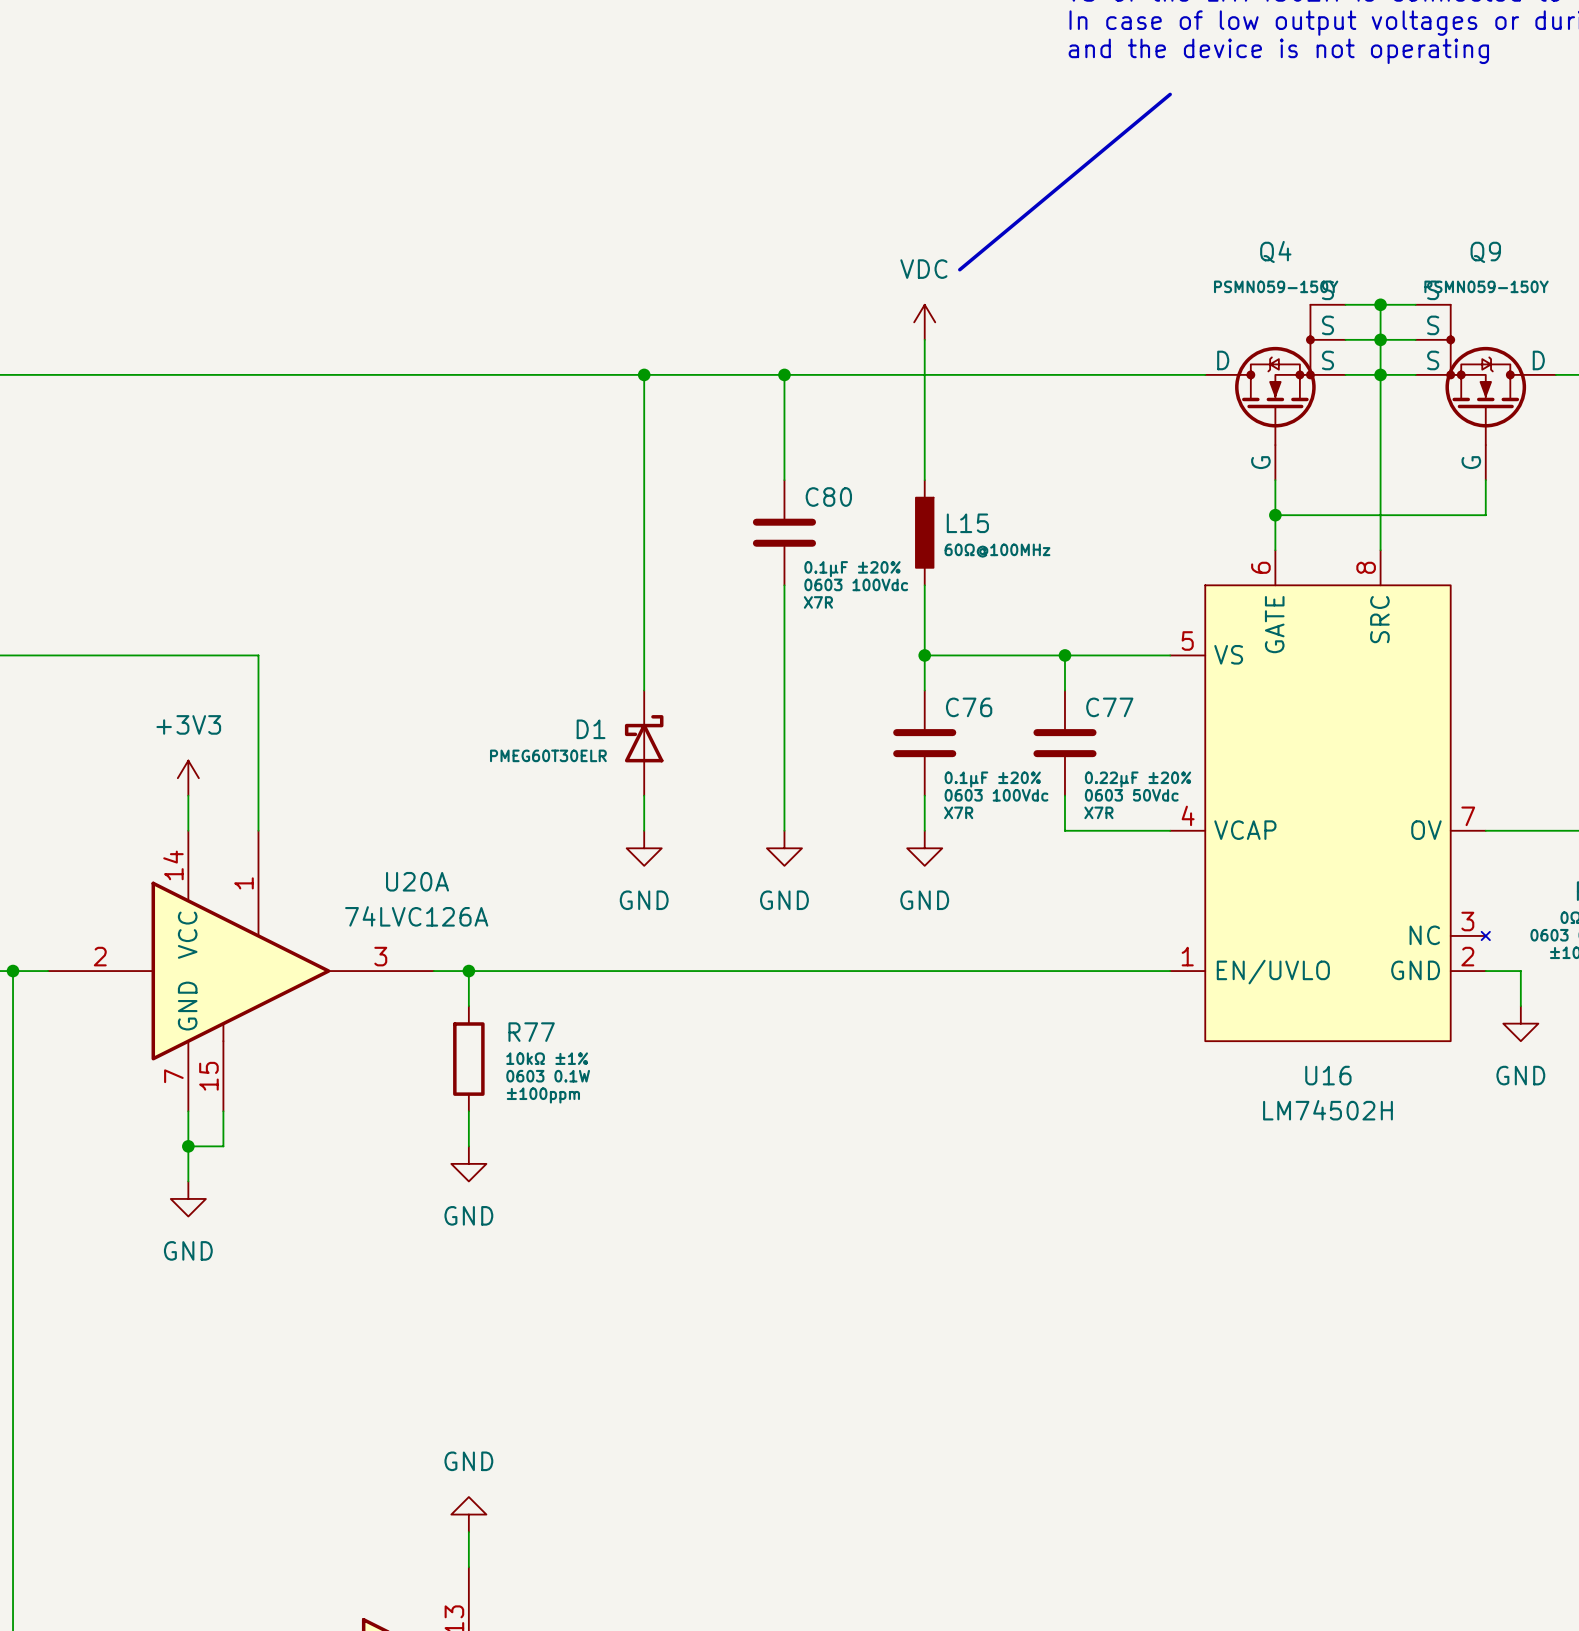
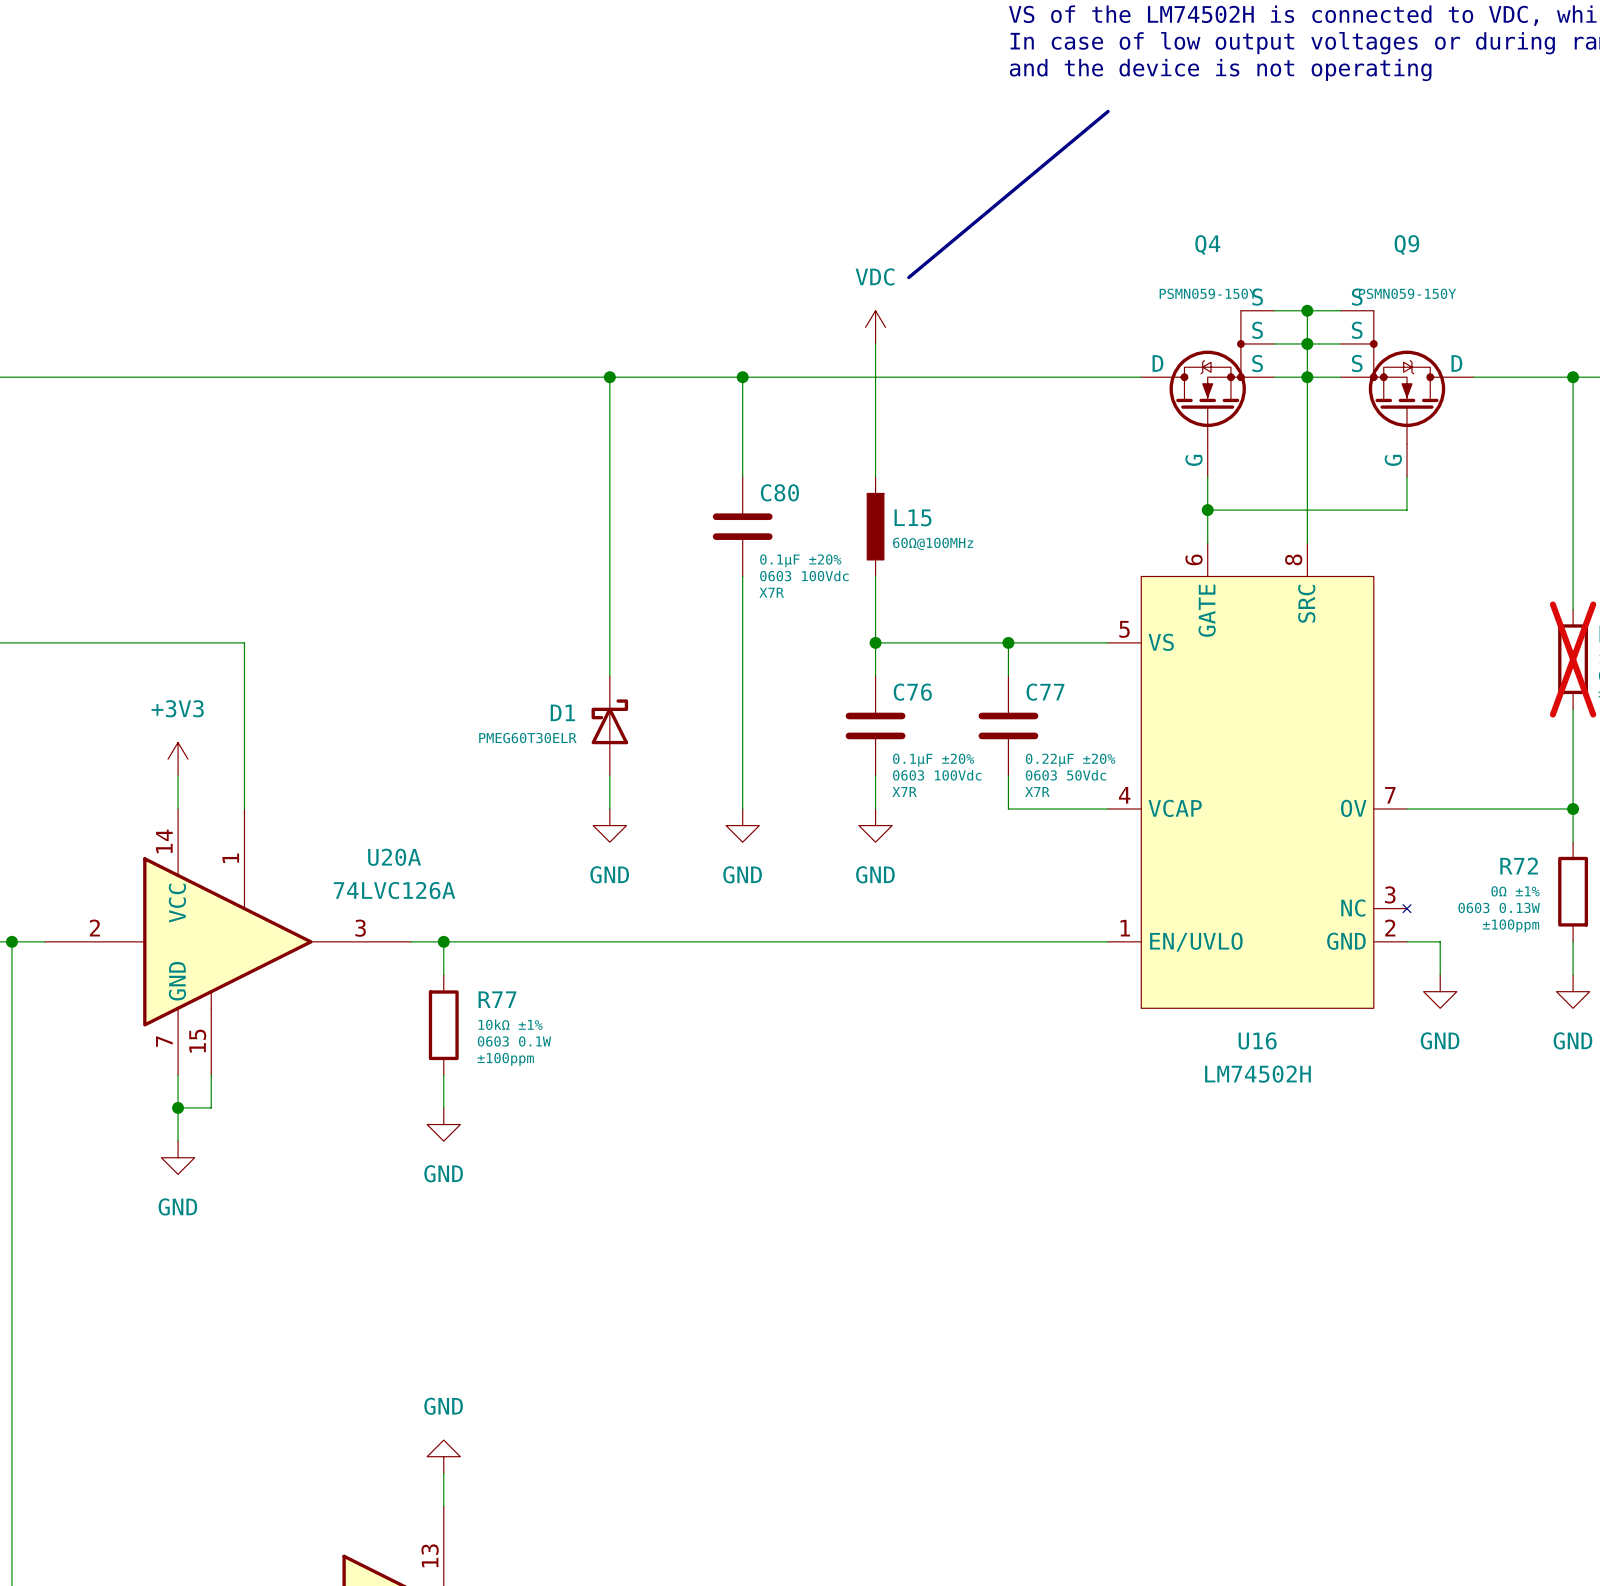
Q4 name position: Q4 (1275, 251) -> Q4 (1207, 245)
Q9 name position: Q9 (1485, 252) -> Q9 (1406, 245)

